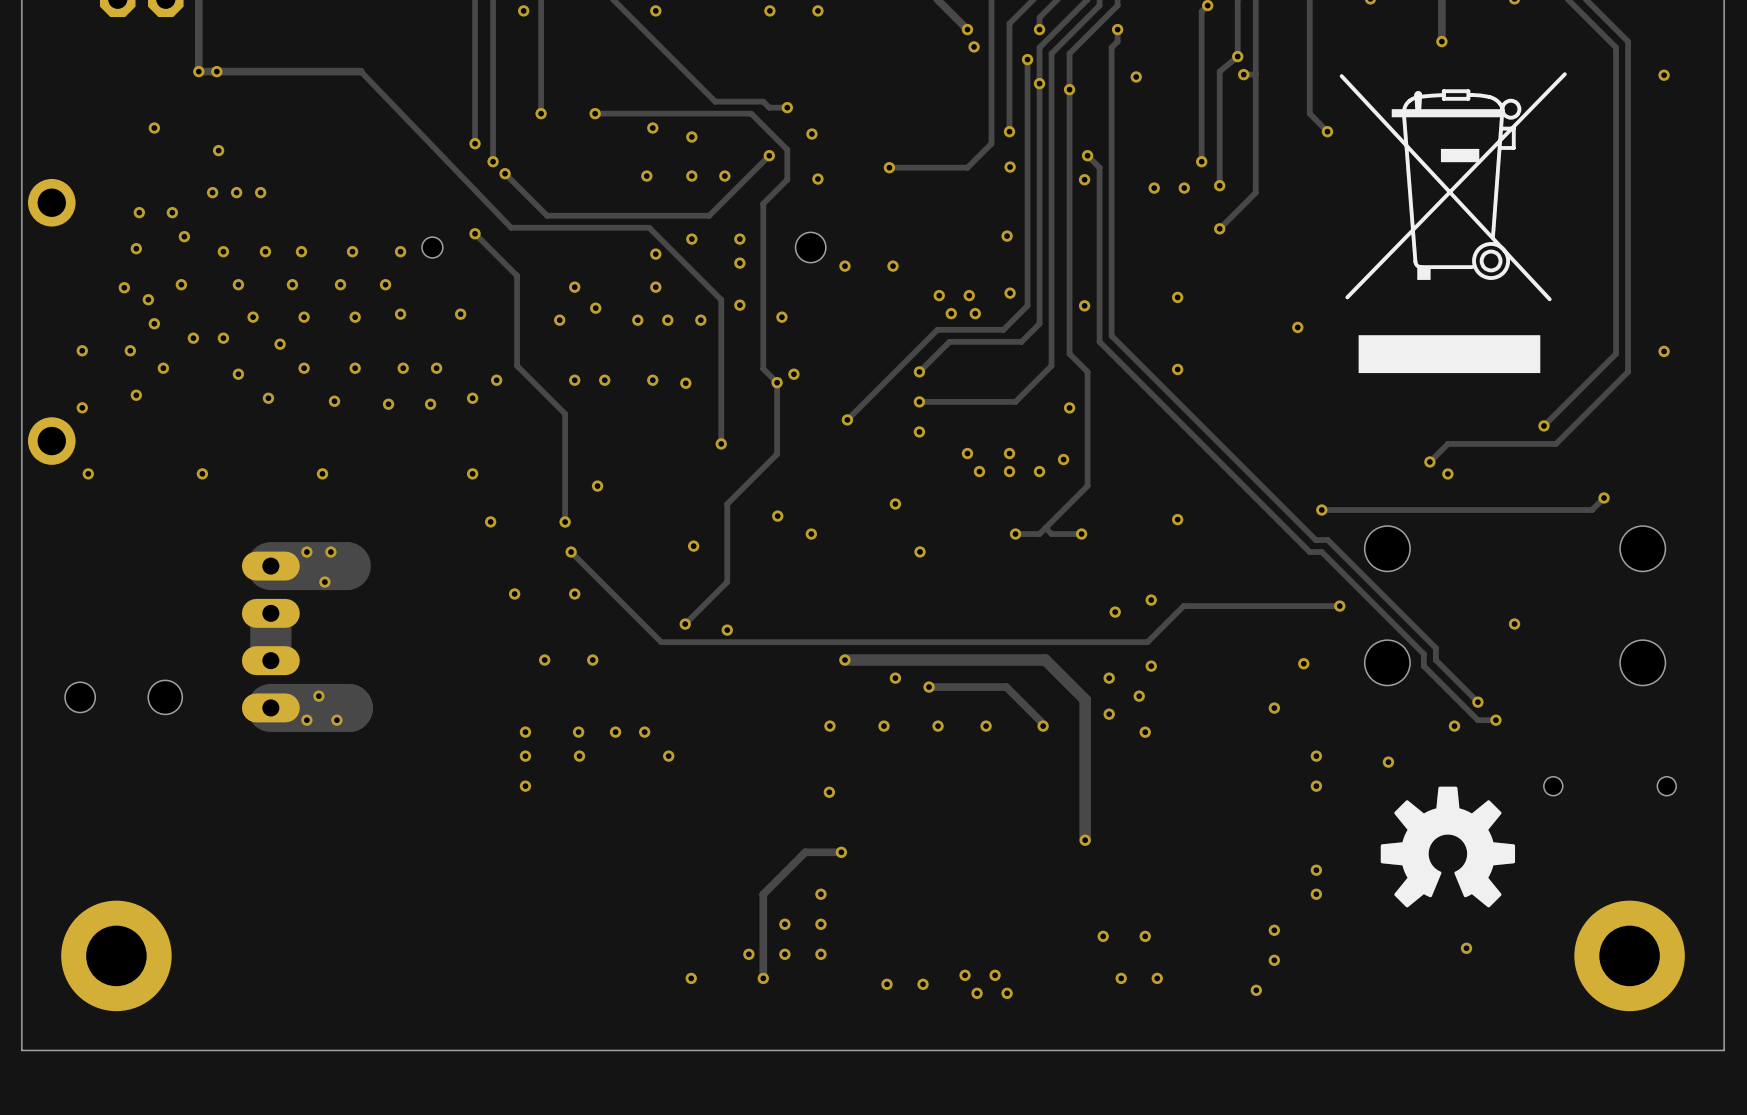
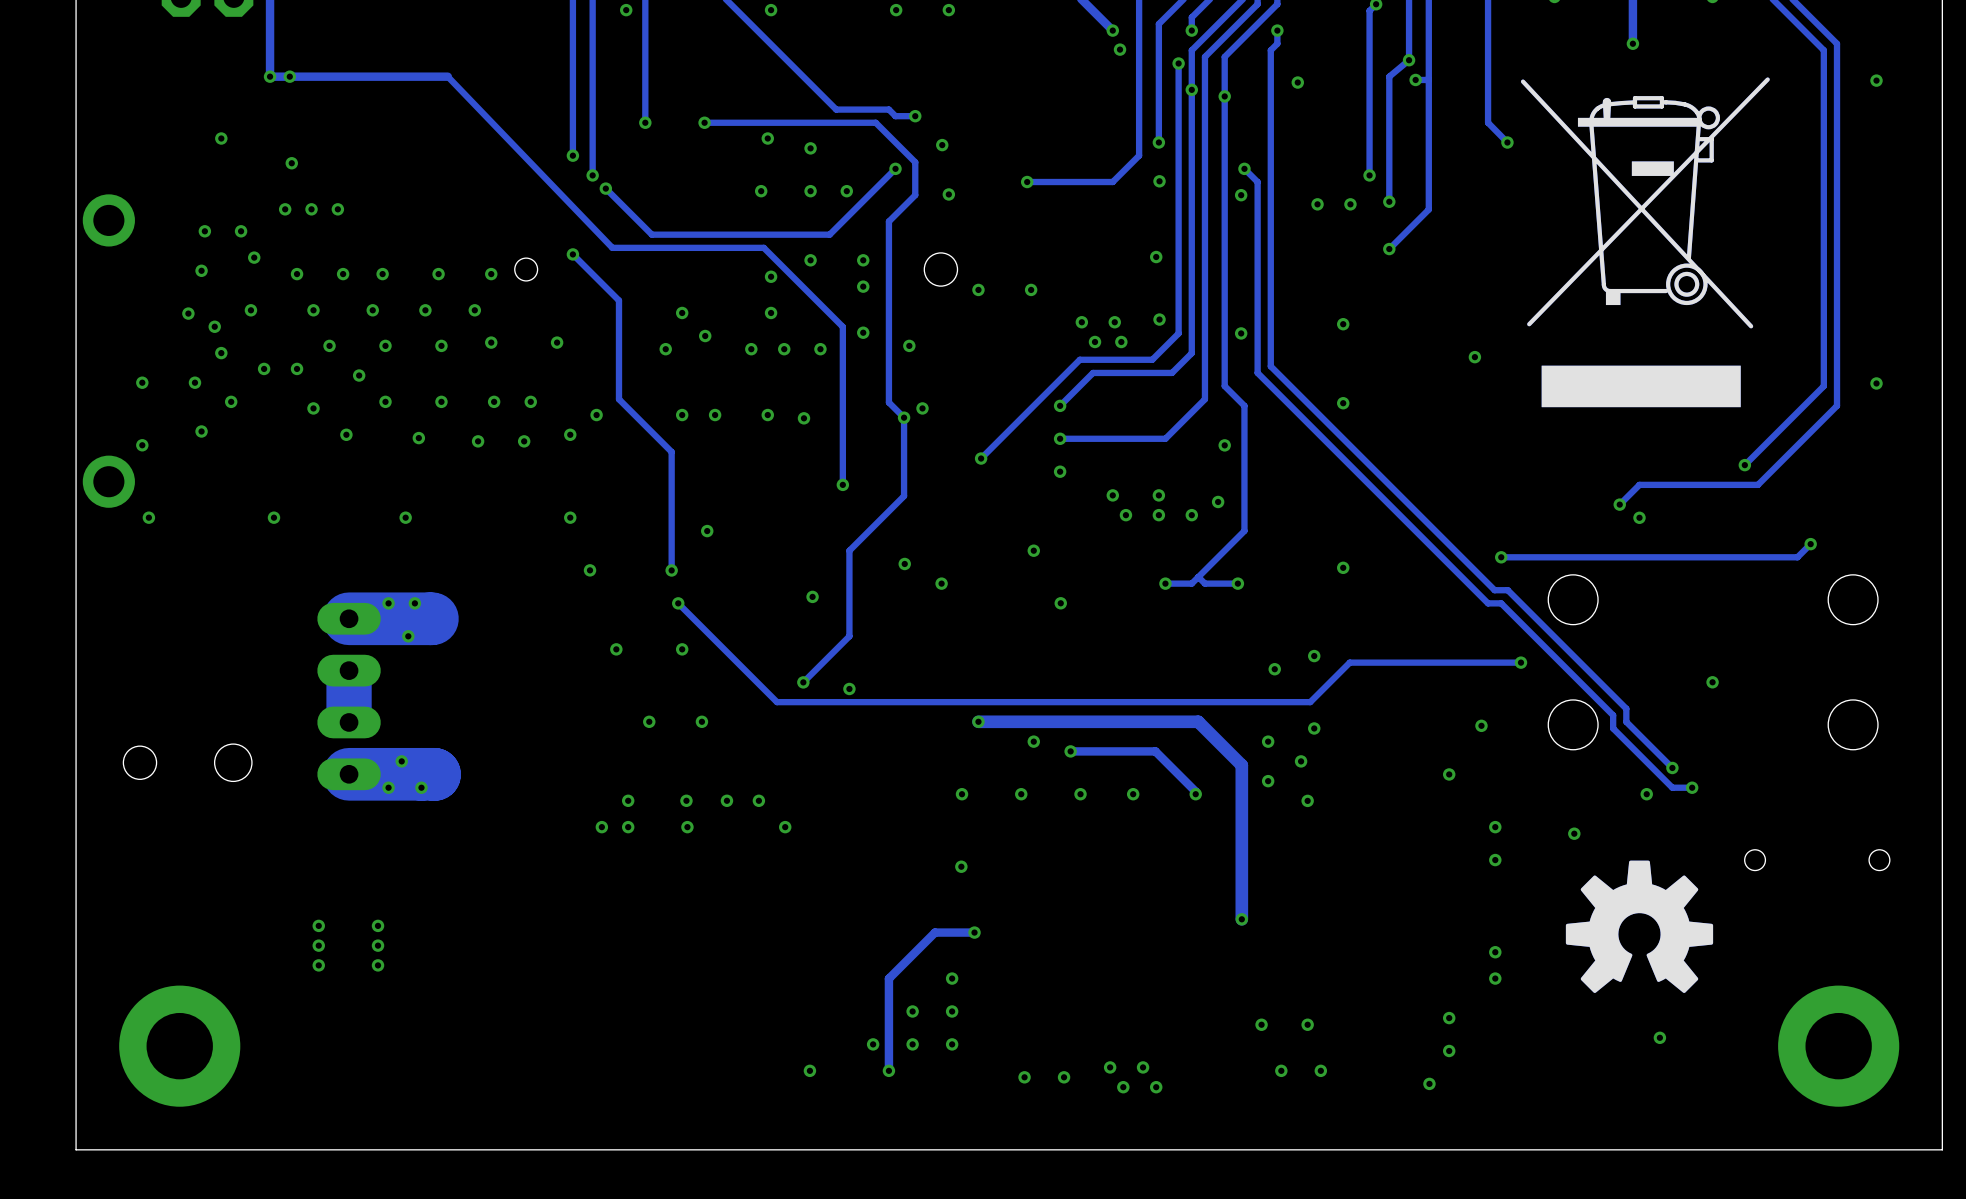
via position: (525, 786) -> (601, 827)
via: none -> (318, 925)
via: none -> (378, 925)
via: none -> (318, 945)
via: none -> (378, 945)
via: none -> (318, 965)
via: none -> (378, 965)

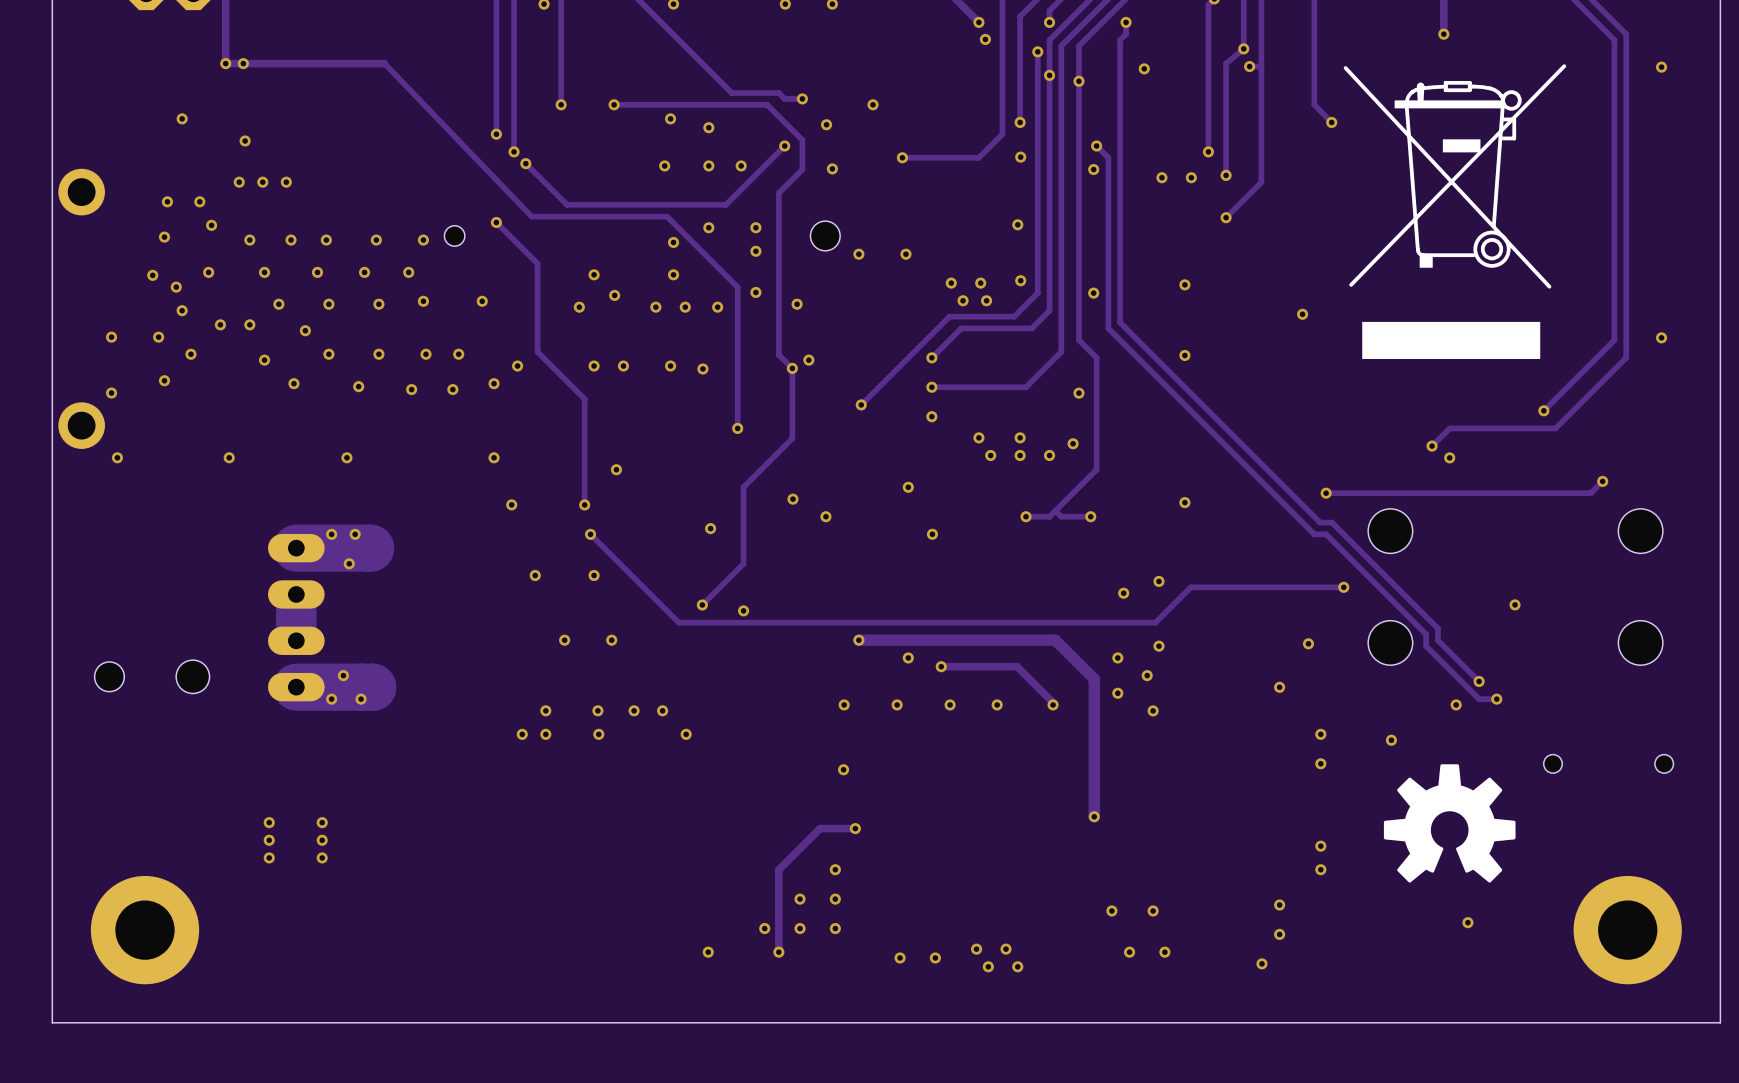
via: none -> (873, 104)

